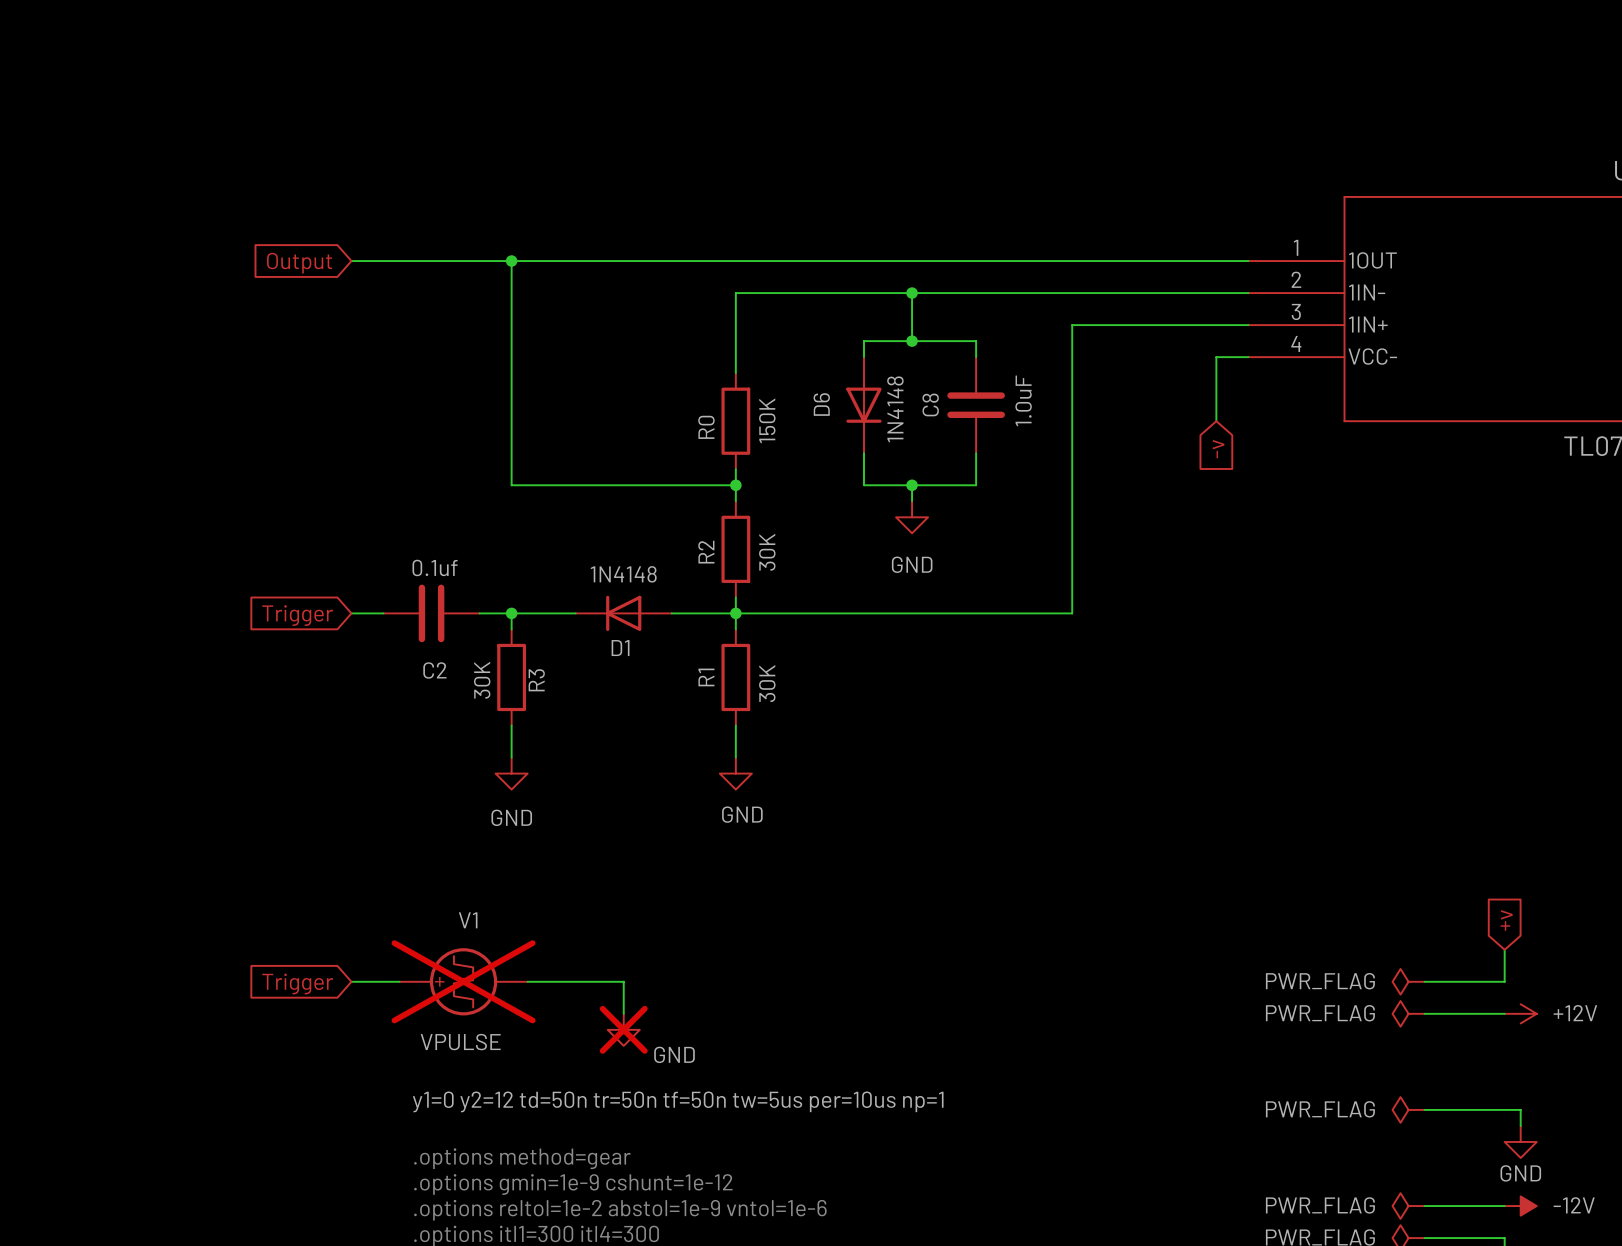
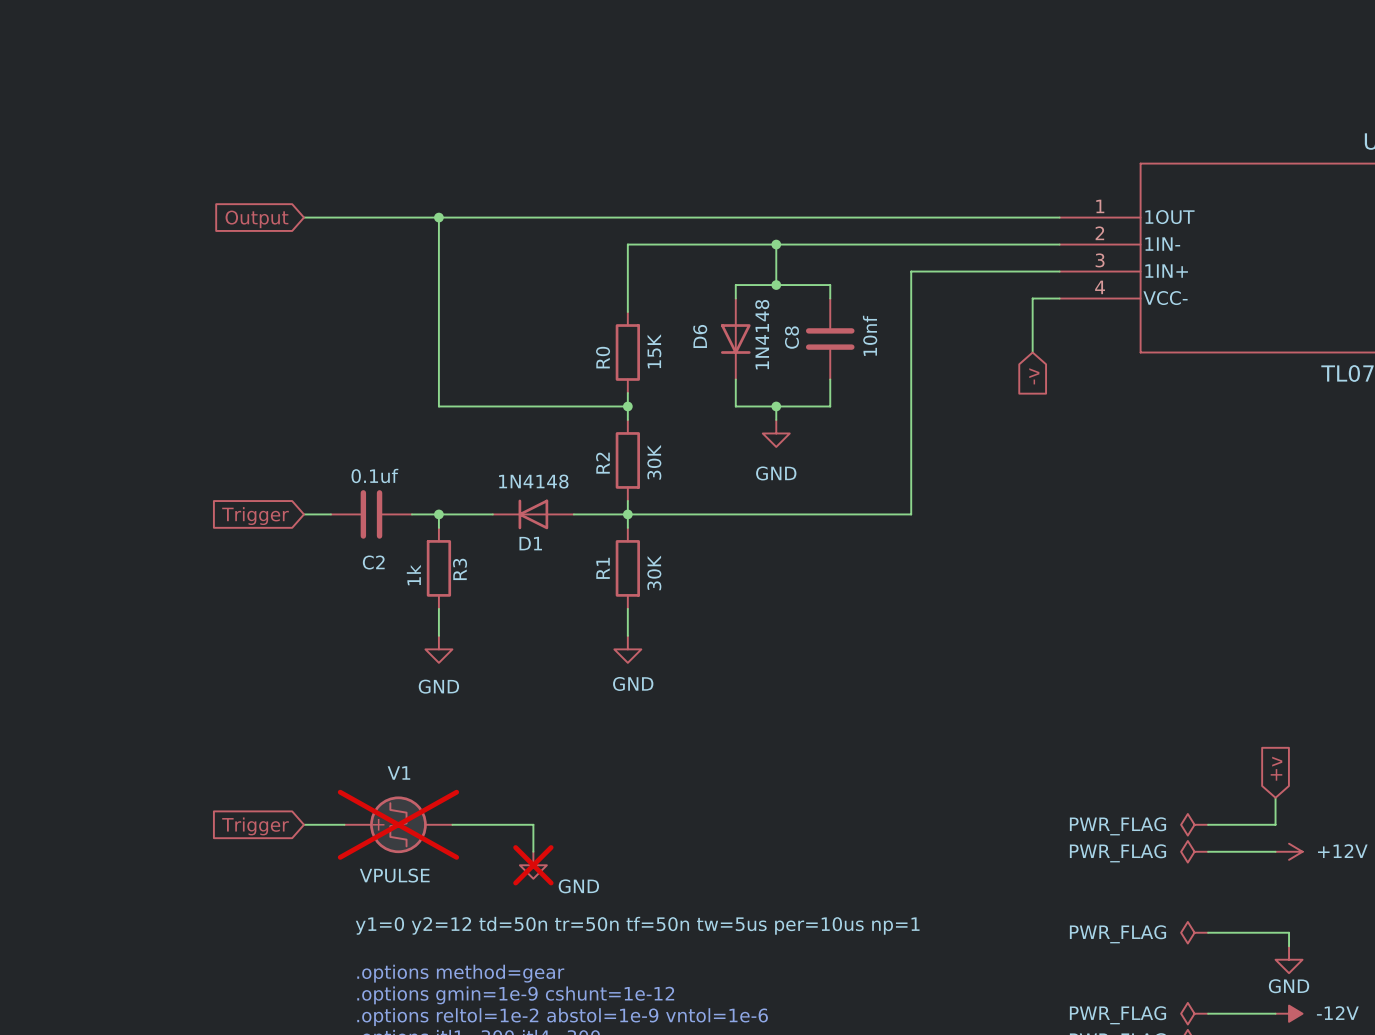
C8 value: 1.0uF (1023, 400) -> 10nf (870, 335)
R0 value: 150K (767, 420) -> 15K (654, 351)
R3 value: 30K (482, 680) -> 1k (413, 575)

